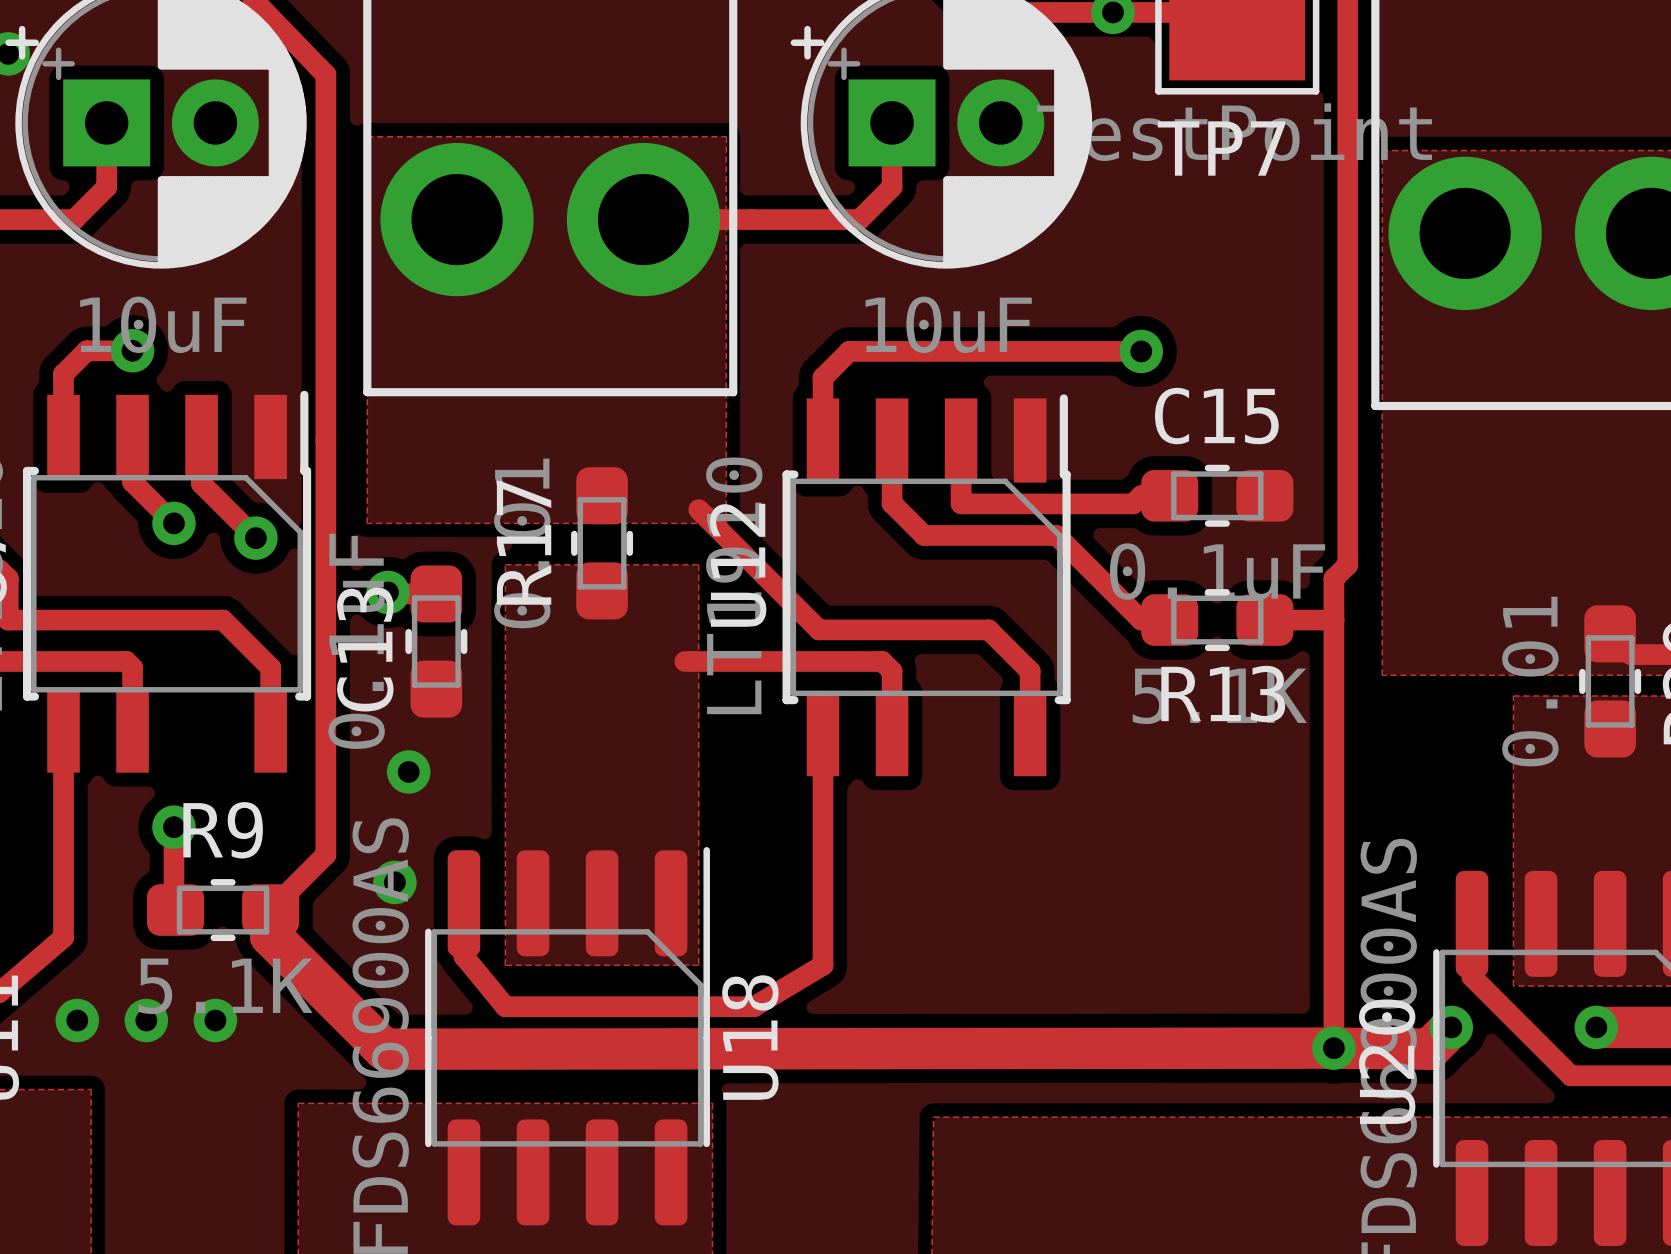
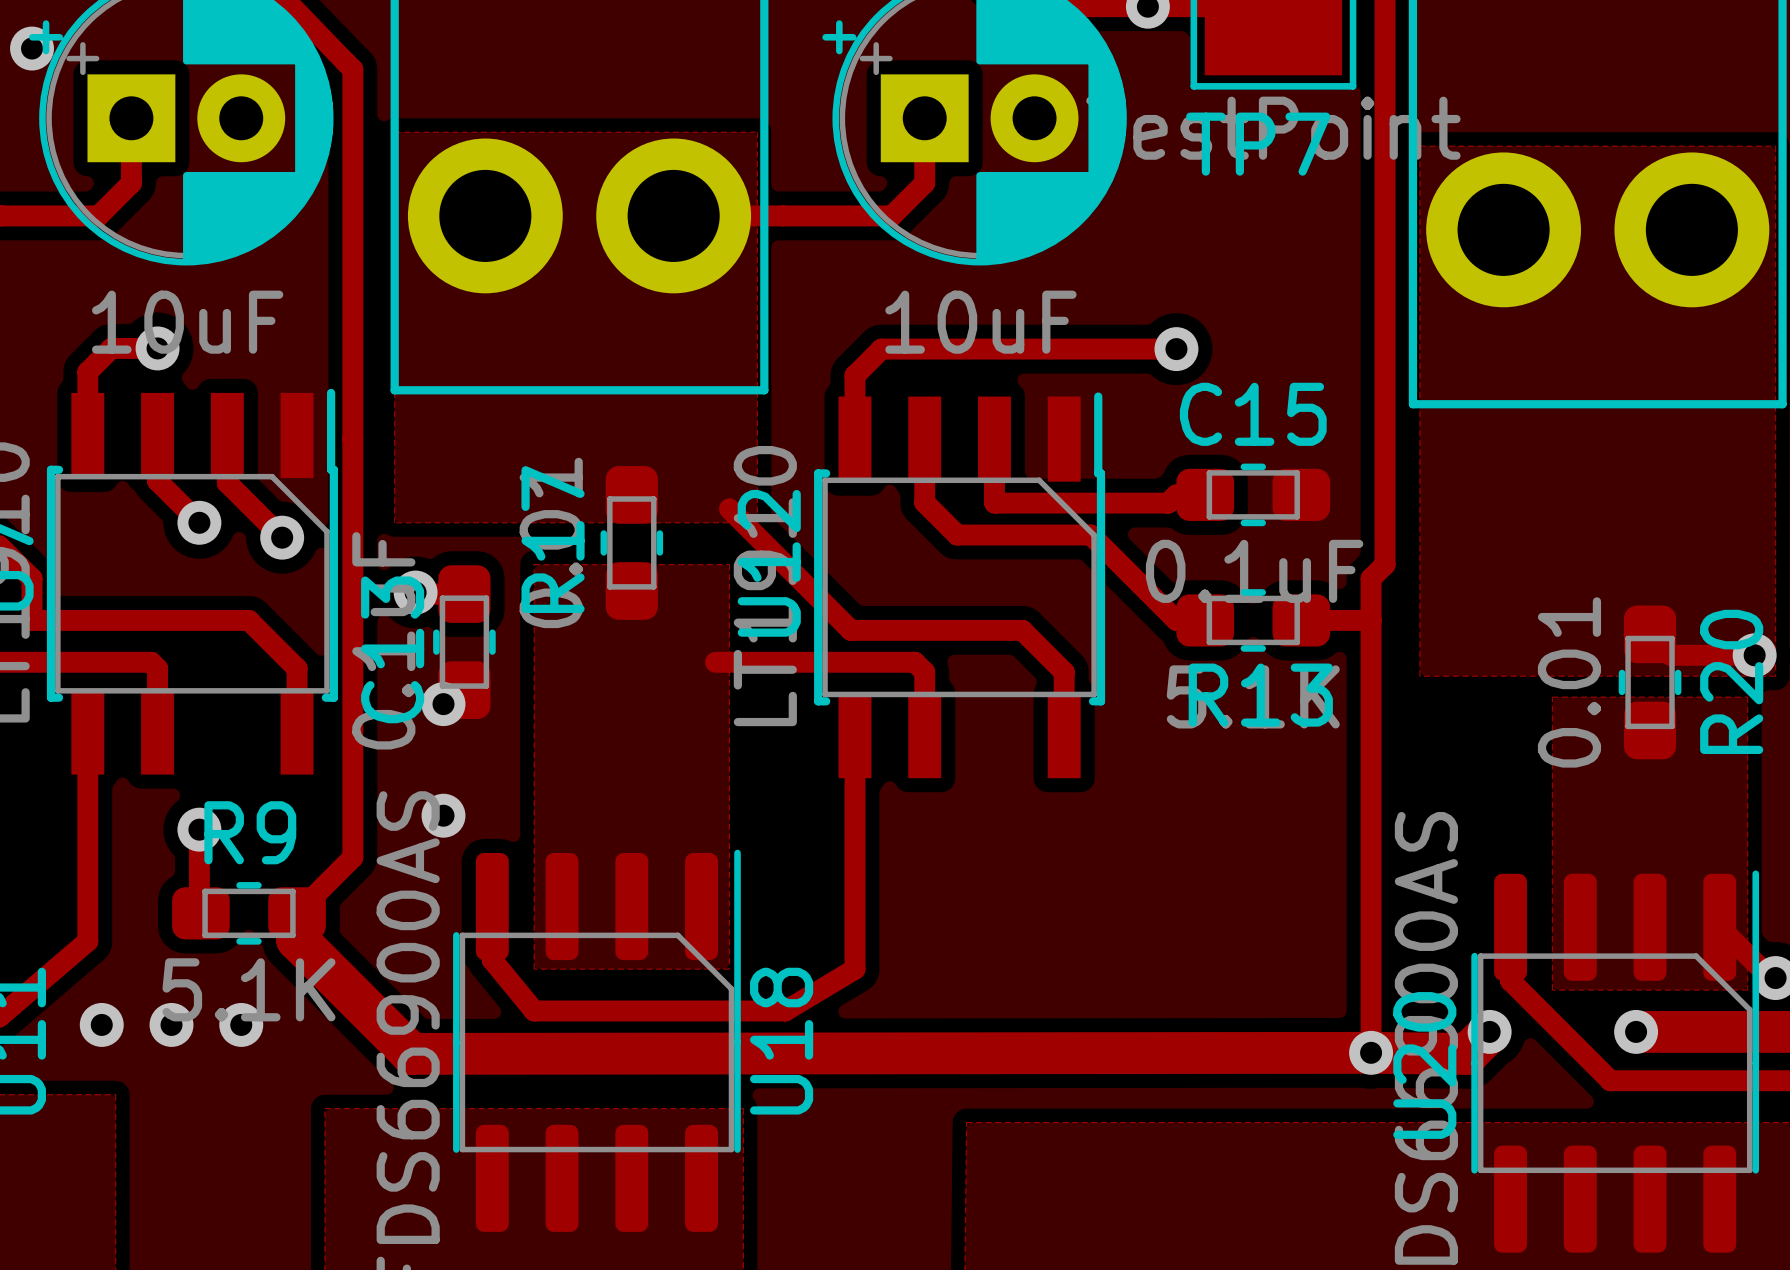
via: none -> (443, 704)
via position: (408, 771) -> (443, 815)
via: (394, 882) -> none

